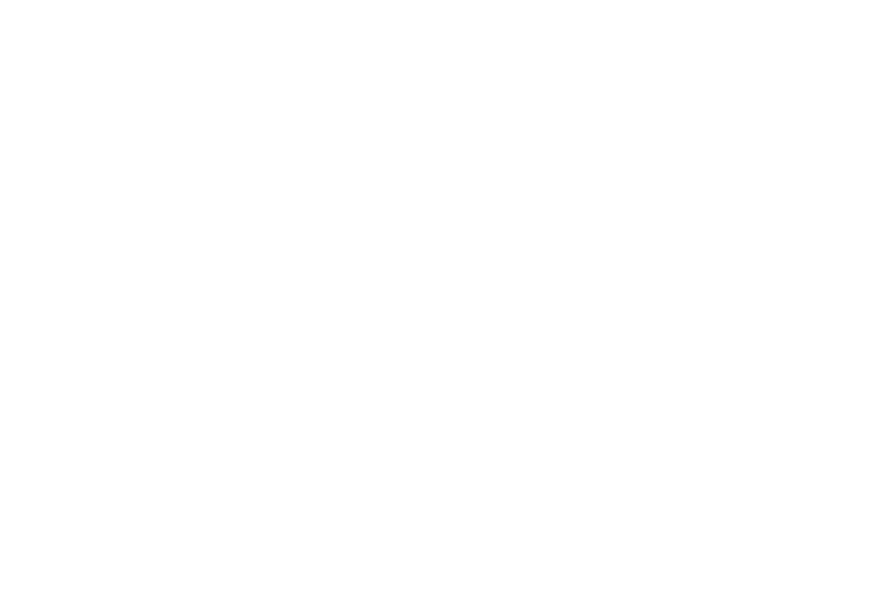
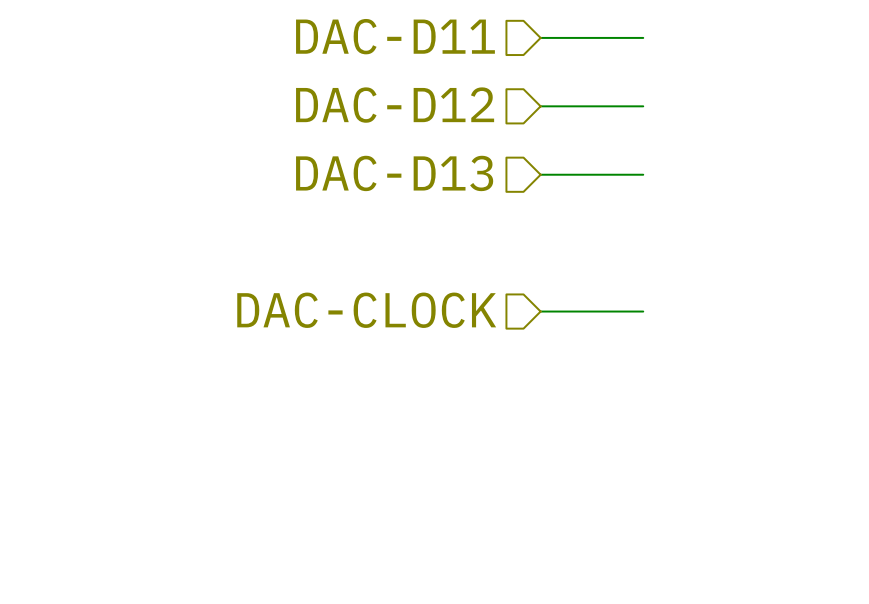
hierarchical label: none -> DAC-D11 (395, 36)
wire: none -> (540, 37) (643, 37)
hierarchical label: none -> DAC-D12 (395, 105)
wire: none -> (540, 106) (643, 106)
hierarchical label: none -> DAC-D13 (394, 173)
wire: none -> (540, 174) (643, 174)
hierarchical label: none -> DAC-CLOCK (366, 310)
wire: none -> (540, 311) (643, 311)

